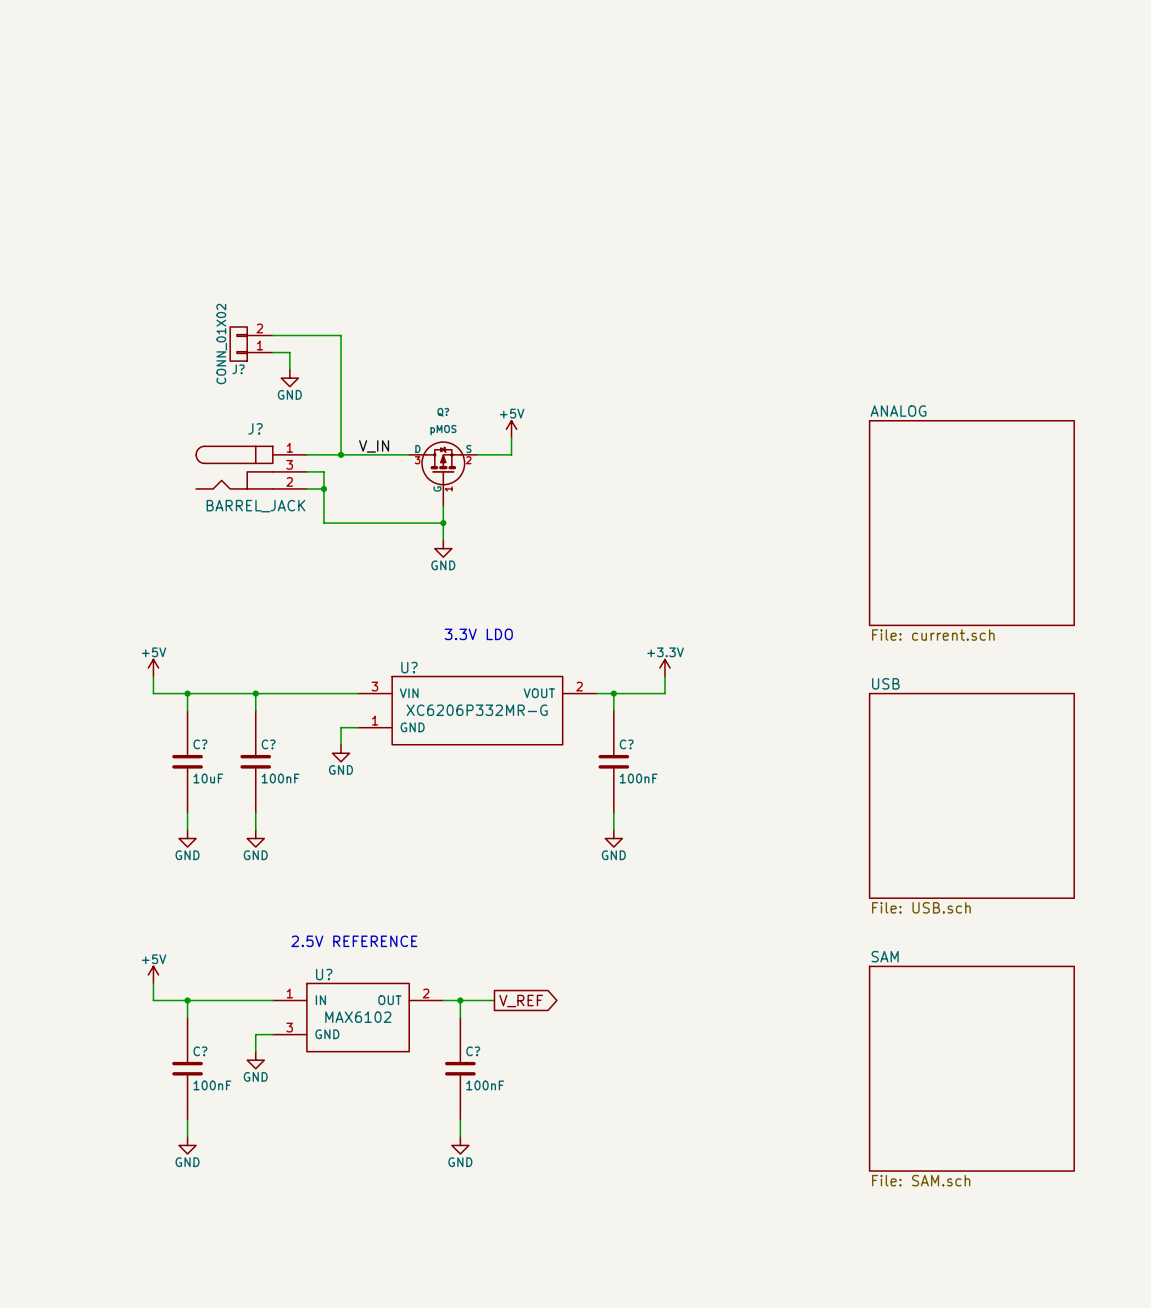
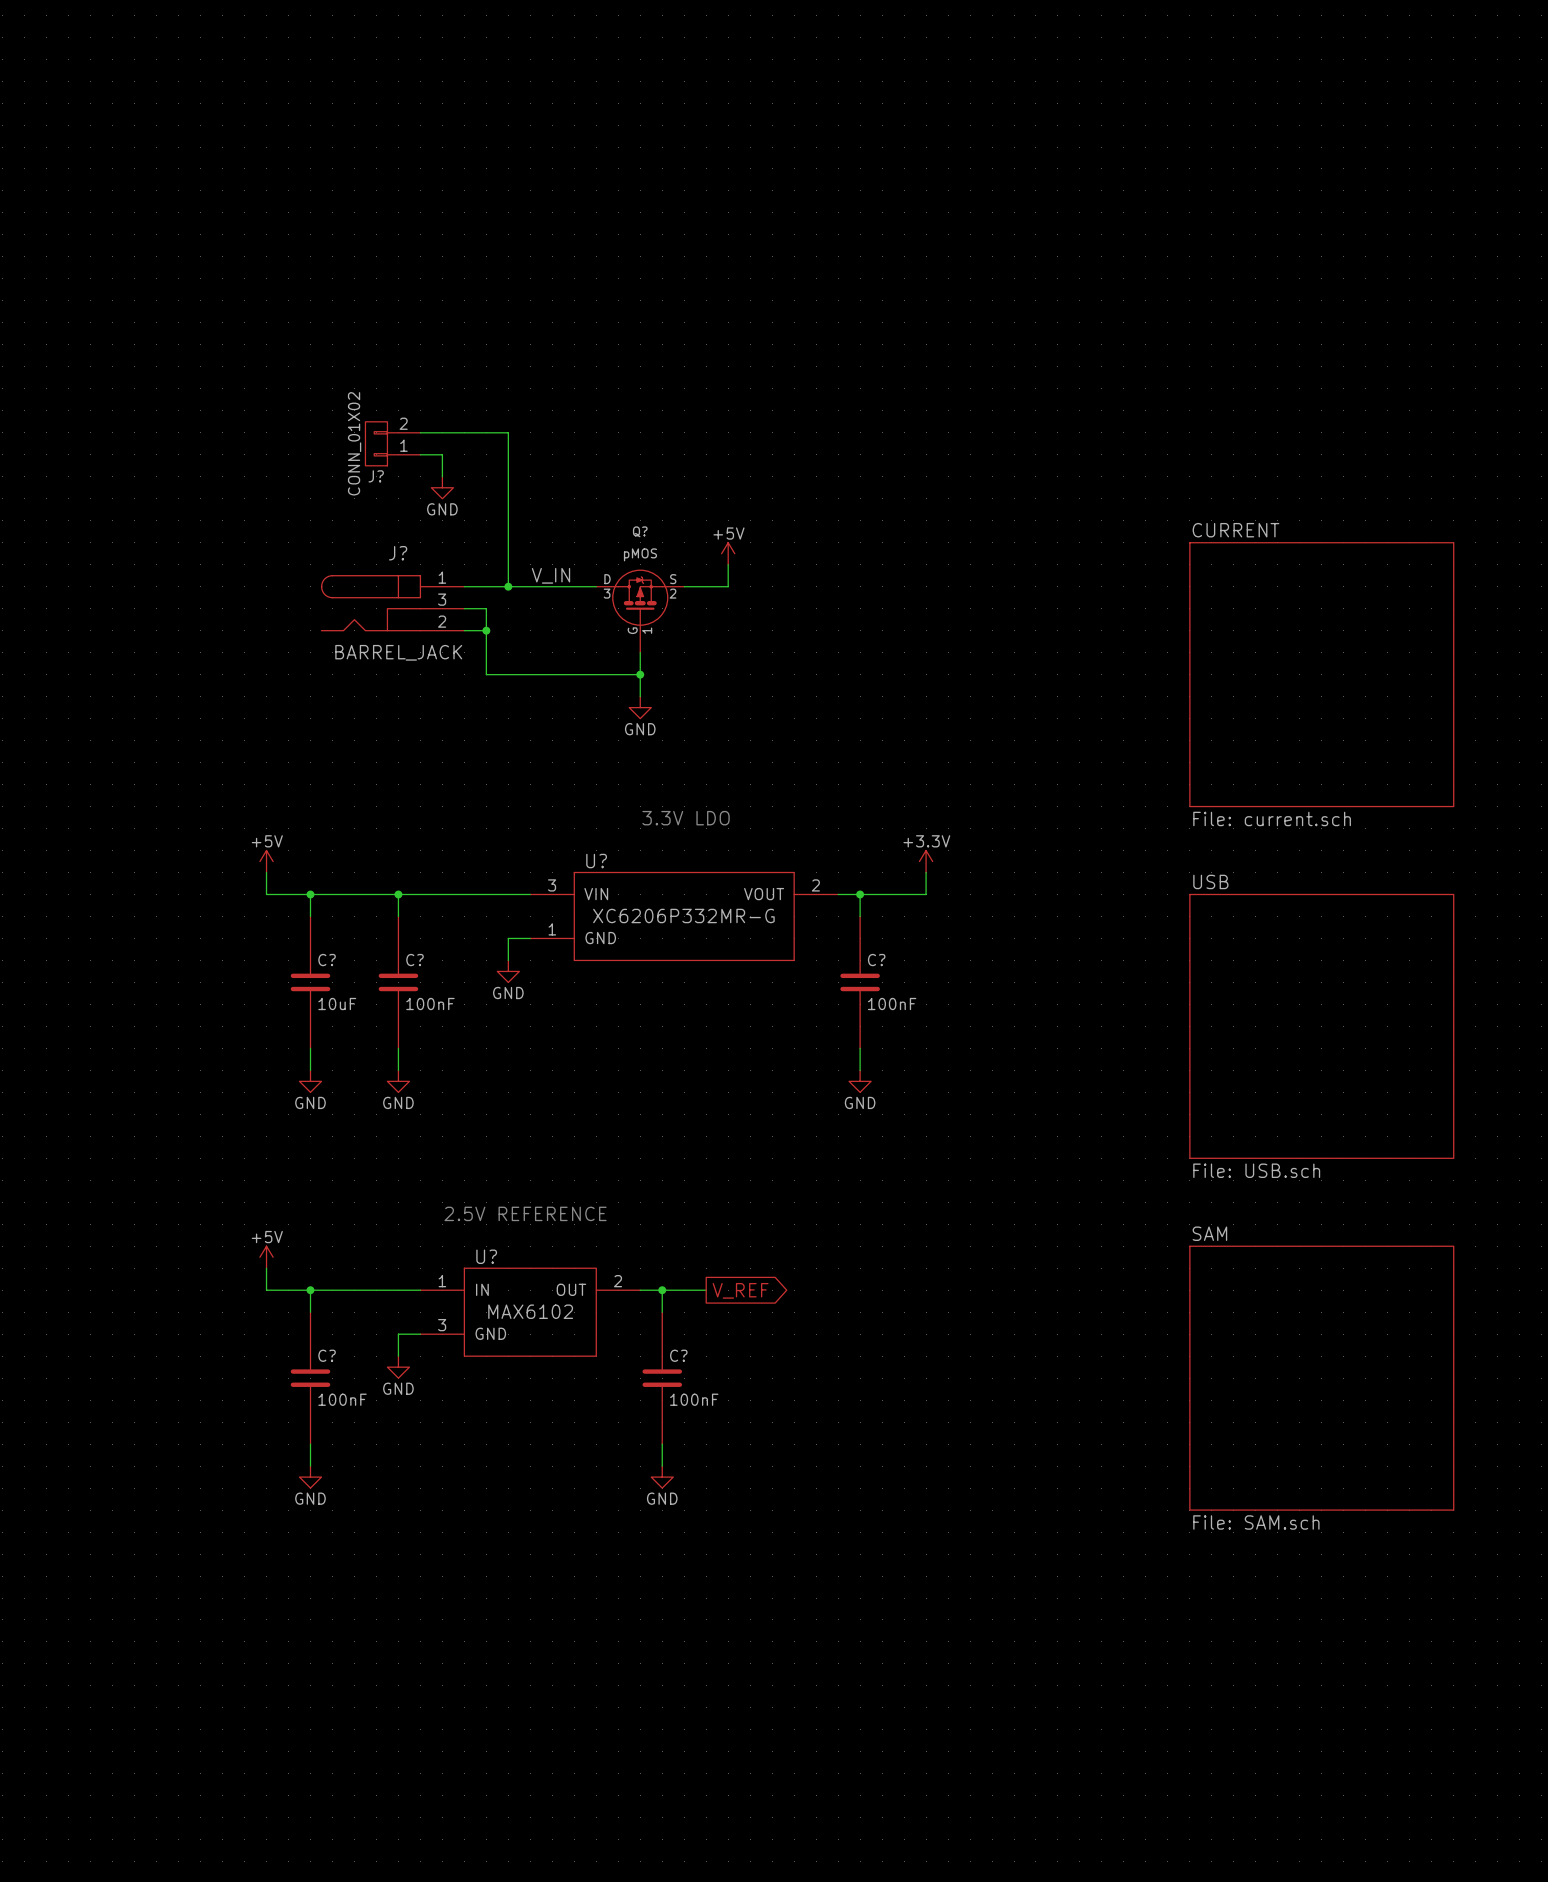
sheet ANALOG name: ANALOG (898, 411) -> CURRENT (1235, 530)

